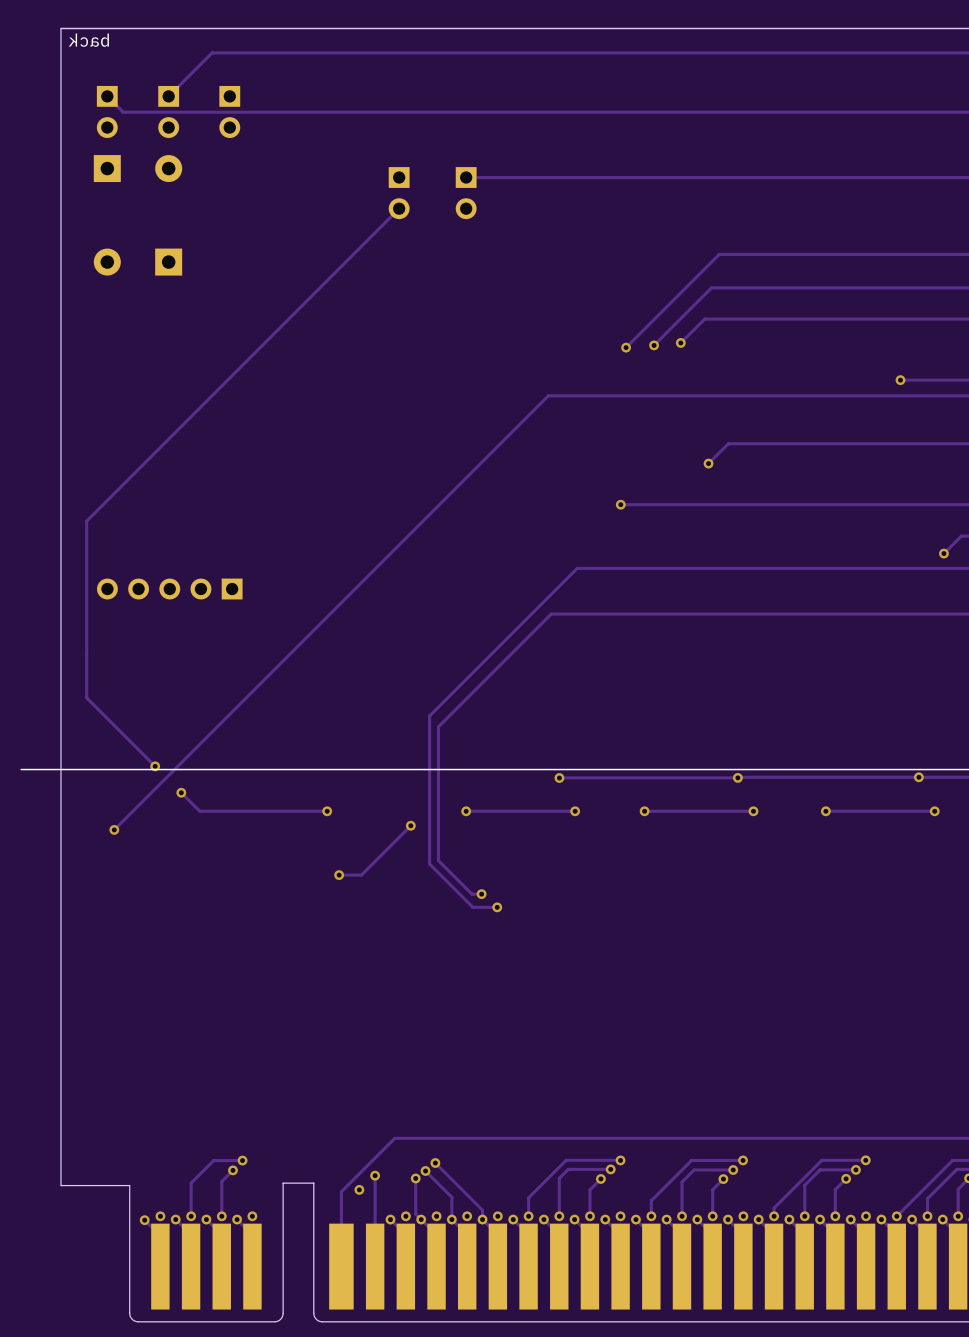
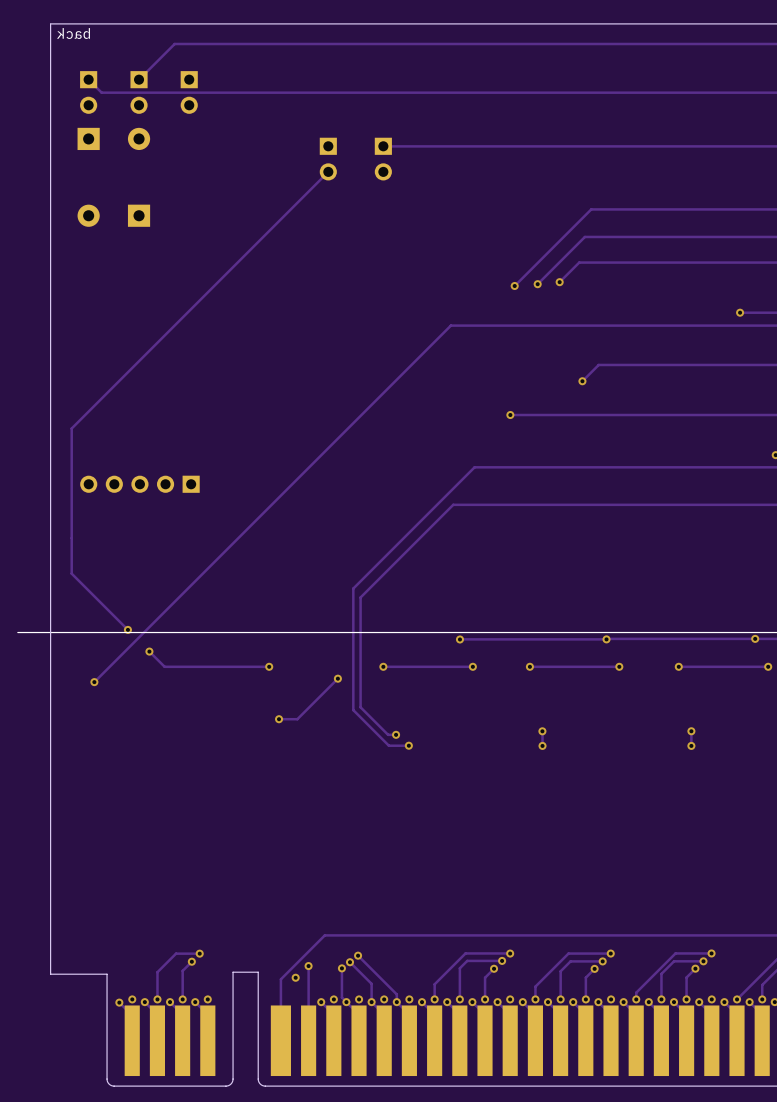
track: none -> (542, 731) (542, 745)
via: none -> (542, 731)
track: none -> (691, 731) (691, 745)
via: none -> (691, 731)
via: none -> (542, 745)
via: none -> (691, 745)

